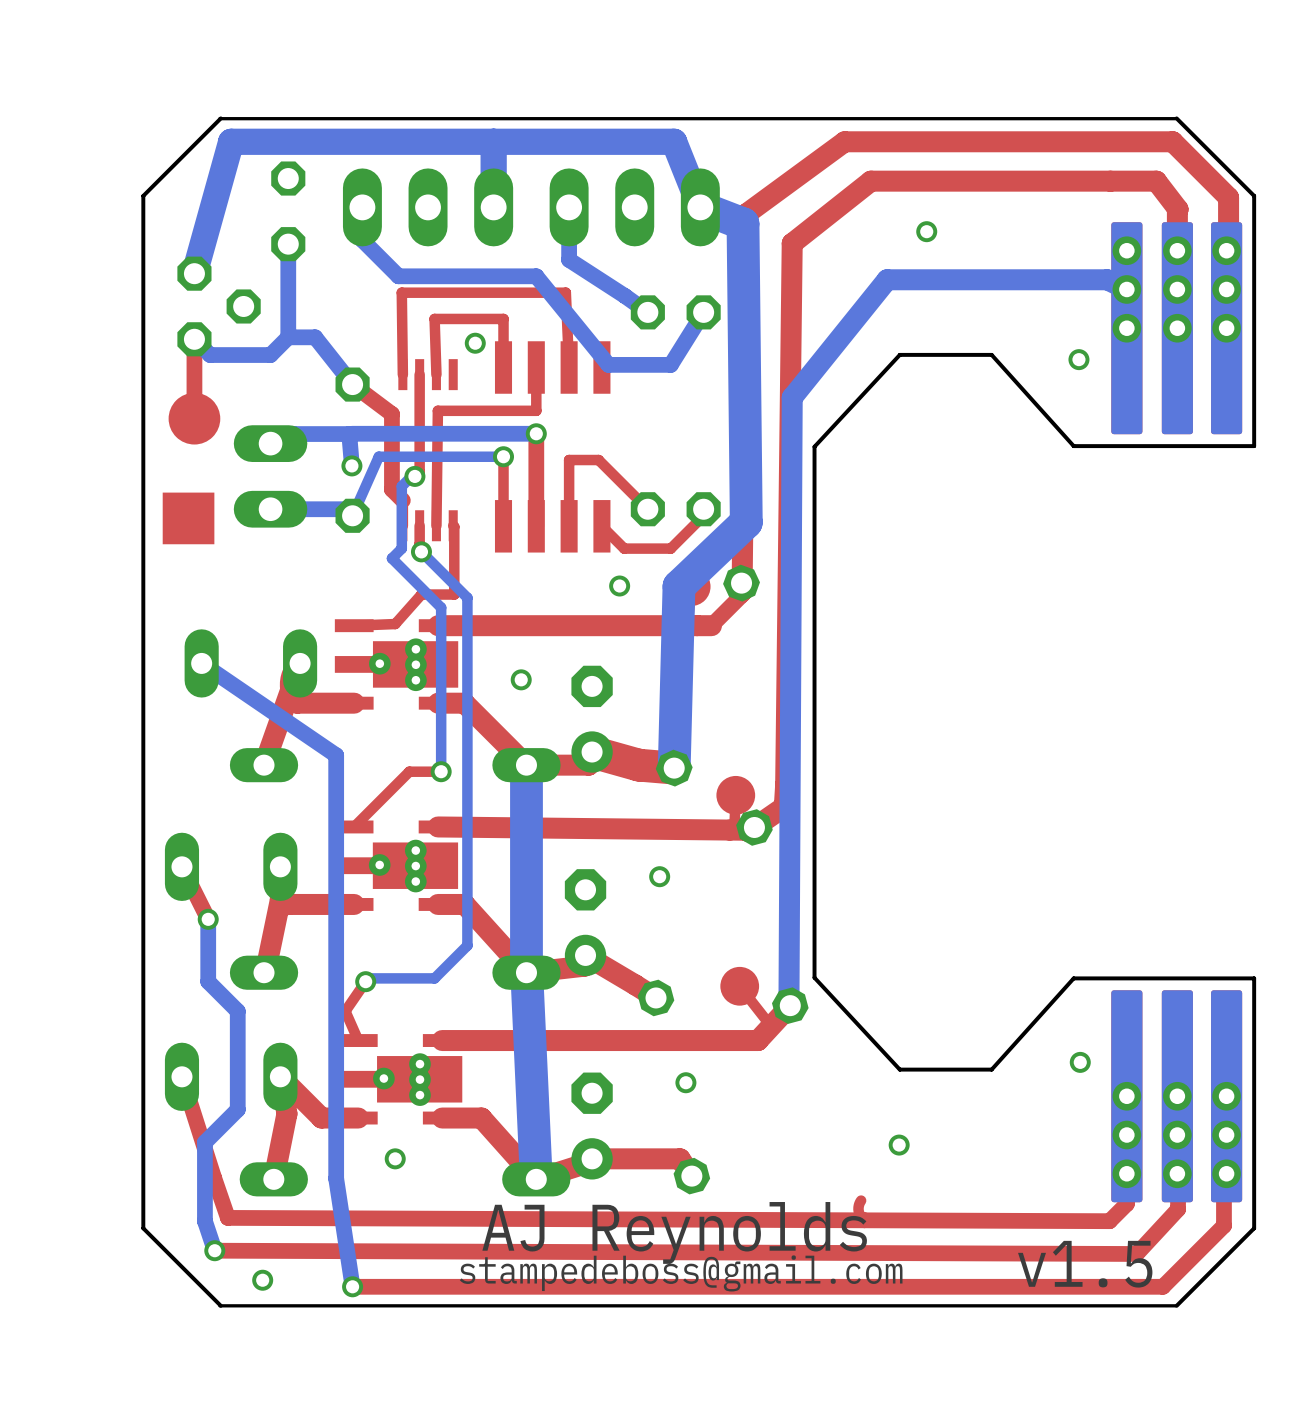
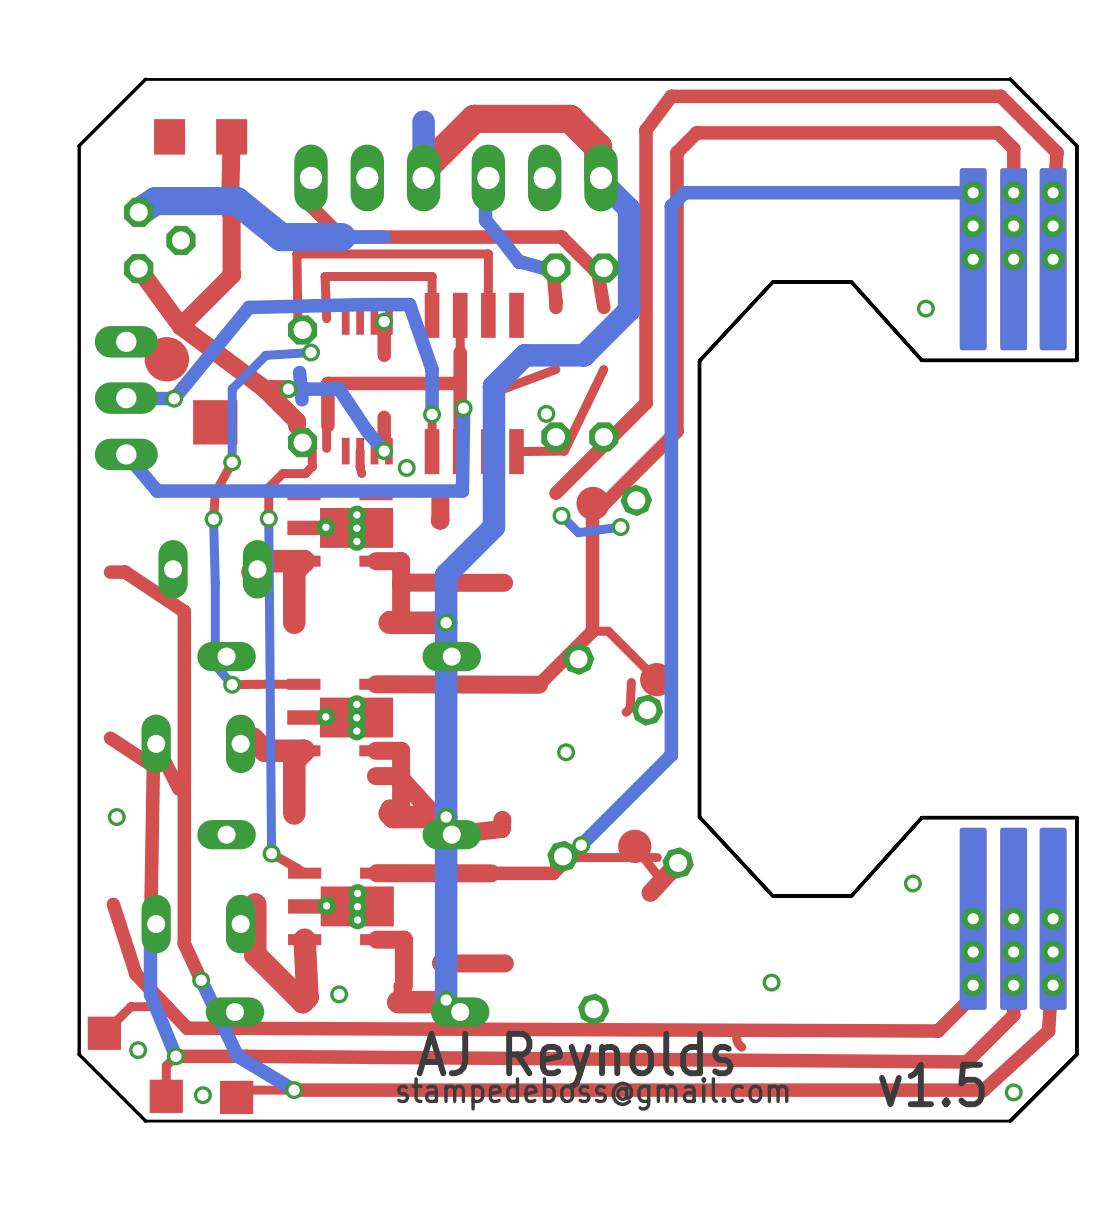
board edge: none -> (1010, 79) (1076, 145) (1076, 360) (921, 360) (851, 282) (772, 282) (699, 360) (699, 817) (772, 895) (851, 895) (921, 817) (1076, 817) (1076, 1054) (1010, 1121)
part: none -> (200, 136)
top track: none -> (231, 136) (229, 211) (231, 212) (232, 274) (180, 326)
top track: none -> (310, 177) (310, 206) (341, 237) (561, 237) (598, 273) (603, 307)
bottom track: (362, 207) (362, 240) (398, 276) -> (138, 212) (155, 201) (236, 201) (281, 237) (341, 237)
bottom track: none -> (485, 177) (485, 220) (519, 262) (553, 270)
bottom track: (569, 207) (569, 259) (647, 312) -> none
top track: none -> (598, 177) (598, 147) (570, 118) (474, 118) (423, 169) (423, 177)
bottom track: none -> (598, 177) (629, 208) (629, 310) (584, 355) (524, 355) (493, 386) (493, 527) (446, 574) (446, 1000)
part: (288, 211) -> none
top track: none -> (1013, 192) (1013, 148) (997, 132) (696, 132) (676, 152) (676, 431) (592, 515) (592, 631)
via: (926, 231) -> none
bottom track: (288, 244) (288, 337) -> none
bottom track: (194, 273) (231, 141) (674, 141) (700, 207) (743, 223) (746, 522) (679, 586) (674, 768) -> none
bottom track: (447, 276) (536, 276) (608, 364) (670, 364) (703, 312) -> none
bottom track: (1126, 289) (1107, 279) (887, 279) (792, 397) (788, 1007) (787, 1009) (790, 1005) -> none
bottom track: none -> (973, 259) (973, 192) (684, 192) (671, 206) (671, 755) (581, 845)
top track: none -> (1053, 259) (1053, 192) (1057, 152) (1000, 96) (671, 96) (646, 130) (646, 403) (555, 493)
part position: (219, 306) -> (159, 240)
top track: none -> (138, 268) (180, 326)
top track: none -> (553, 270) (555, 307)
top track: (503, 322) (503, 318) (434, 318) (436, 374) -> (432, 276) (325, 276) (326, 318)
top track: (1177, 328) (1178, 209) (1156, 181) (870, 181) (792, 243) (784, 806) (747, 831) (438, 826) -> none
top track: (1226, 328) (1228, 197) (1172, 141) (844, 141) (746, 213) (742, 595) -> none
bottom track: (288, 337) (270, 355) (210, 355) (194, 339) -> none
bottom track: (288, 337) (315, 337) (352, 384) -> none
top track: (194, 339) (194, 418) -> none
via position: (475, 343) -> (384, 321)
top track: (569, 367) (565, 292) (401, 292) (402, 374) -> (488, 315) (488, 253) (296, 253) (297, 318)
top track: (419, 374) (419, 471) (414, 476) -> none
top track: none -> (384, 321) (384, 355)
top track: none -> (180, 326) (268, 391) (271, 389) (288, 389)
top track: (352, 384) (391, 414) (391, 489) (402, 500) (402, 525) -> none
bottom track: none -> (310, 352) (265, 355) (232, 389) (232, 462)
via: none -> (310, 352)
top track: (536, 410) (437, 410) (436, 525) -> (460, 352) (460, 372)
part footprint: [233, 425, 308, 528] -> [193, 400, 238, 445]
bottom track: (536, 433) (293, 434) (270, 443) -> none
via: (536, 433) -> none
top track: none -> (460, 383) (327, 383) (326, 448)
top track: none -> (264, 388) (296, 421) (297, 448)
bottom track: none -> (288, 389) (339, 389) (367, 431) (384, 451)
bottom track: (503, 456) (378, 456) (352, 515) (346, 509) (270, 509) -> none
via: (503, 456) -> none
top track: (569, 460) (598, 460) (647, 509) -> (488, 394) (555, 369)
bottom track: none -> (126, 398) (174, 398) (249, 307) (409, 304) (432, 369) (432, 414)
part: none -> (126, 398)
via: none -> (174, 398)
via position: (351, 465) -> (288, 389)
bottom track: none -> (463, 408) (462, 491) (157, 491) (126, 454)
via: none -> (463, 408)
bottom track: (414, 476) (411, 476) (401, 486) (401, 548) (391, 558) (441, 607) (441, 771) -> none
via: (414, 476) -> none
via: none -> (432, 414)
via: none -> (546, 413)
top track: none -> (384, 417) (384, 451)
top track: (703, 509) (703, 515) (670, 548) (624, 548) (601, 526) -> (603, 369) (564, 451) (516, 451)
part: (188, 518) -> none
top track: none -> (312, 448) (312, 466) (305, 473) (282, 473) (268, 487) (268, 518)
via: none -> (384, 451)
top track: (453, 525) (454, 594) (421, 594) (395, 624) (354, 625) -> none
top track: none -> (232, 462) (215, 493) (213, 519)
via: none -> (232, 462)
via: none -> (406, 467)
bottom track: (421, 551) (467, 597) (467, 945) (434, 978) (365, 978) (365, 981) -> none
via: (421, 551) -> none
top track: none -> (440, 493) (439, 520)
top track: (741, 583) (744, 592) (711, 625) (438, 625) -> none
via position: (619, 586) -> (561, 515)
bottom track: none -> (561, 515) (578, 532) (620, 527)
bottom track: none -> (268, 518) (271, 853)
via: none -> (268, 518)
bottom track: none -> (213, 519) (215, 665) (232, 684)
via: none -> (213, 519)
via: none -> (620, 527)
top track: none -> (376, 561) (401, 561) (401, 619) (389, 619) (389, 622) (446, 622)
bottom track: (201, 663) (336, 755) (336, 1178) (352, 1286) -> none
part position: (396, 664) -> (340, 527)
top track: none -> (110, 572) (125, 572) (184, 611) (184, 943) (201, 980)
top track: none -> (252, 572) (263, 561) (303, 561) (294, 570) (294, 622)
top track: none -> (439, 582) (401, 582)
via: (521, 679) -> none
top track: none -> (504, 582) (439, 582)
part: none -> (577, 600)
top track: (354, 703) (297, 703) (291, 693) (290, 690) (290, 686) (290, 682) (293, 672) (300, 663) (264, 765) -> none
top track: (438, 703) (464, 703) (526, 765) (588, 765) (592, 752) (638, 765) (674, 768) -> none
part: (698, 712) -> none
part: (592, 719) -> none
via: none -> (446, 622)
top track: none -> (592, 631) (539, 684) (375, 684)
top track: none -> (592, 631) (608, 631) (656, 679)
bottom track: (526, 765) (526, 972) (526, 966) (536, 1179) -> none
top track: (441, 771) (409, 771) (354, 826) -> none
via: (441, 771) -> none
part position: (735, 795) -> (656, 679)
via: none -> (232, 684)
top track: none -> (303, 684) (232, 684)
top track: none -> (110, 738) (153, 766) (150, 935)
top track: none -> (252, 738) (265, 750) (303, 750) (294, 760) (294, 813)
part position: (396, 865) -> (340, 717)
top track: none -> (375, 750) (401, 750) (401, 808) (389, 808) (389, 813) (393, 817) (446, 817)
top track: (280, 899) (264, 972) -> none
top track: (280, 899) (286, 904) (354, 904) -> none
bottom track: (208, 919) (208, 981) (237, 1011) (237, 1109) (204, 1142) (204, 1221) (214, 1250) -> none
via: (208, 919) -> none
part: (585, 922) -> none
via: none -> (116, 817)
via: none -> (446, 817)
top track: (581, 966) (585, 955) (656, 997) -> none
top track: (365, 981) (345, 1011) (358, 1040) -> none
via position: (365, 981) -> (271, 853)
top track: none -> (581, 845) (553, 873) (376, 873)
via: none -> (581, 845)
top track: none -> (271, 853) (304, 873)
top track: none -> (657, 857) (568, 857) (561, 864)
top track: (758, 1040) (442, 1040) -> none
top track: none -> (113, 904) (135, 974) (187, 1028) (938, 1031) (973, 995) (973, 918)
top track: none -> (255, 904) (255, 954) (302, 1002) (307, 997) (304, 939)
via position: (1080, 1062) -> (912, 883)
top track: none -> (1013, 918) (1013, 1015) (966, 1061) (175, 1056) (166, 1065) (166, 1096)
top track: none -> (1053, 918) (1053, 985) (1051, 986) (1048, 1031) (983, 1090) (243, 1090) (236, 1097)
top track: (181, 1076) (227, 1217) (1109, 1221) (1126, 1203) (1126, 1096) -> none
part position: (400, 1079) -> (340, 906)
via: (685, 1082) -> none
bottom track: none -> (150, 935) (150, 994) (175, 1056)
top track: none -> (376, 939) (403, 939) (403, 985) (398, 985) (398, 1002) (444, 1002) (446, 1000) (446, 963)
top track: (1177, 1096) (1178, 1209) (1136, 1253) (214, 1250) -> none
top track: (1226, 1096) (1226, 1173) (1223, 1176) (1223, 1225) (1162, 1286) (352, 1286) -> none
top track: (358, 1118) (321, 1118) (280, 1076) (286, 1113) (273, 1179) -> none
top track: (442, 1118) (481, 1118) (536, 1179) (587, 1162) (592, 1158) (680, 1158) (691, 1176) -> none
top track: none -> (441, 962) (504, 963)
part: (592, 1126) -> none
bottom track: none -> (201, 980) (237, 1056) (294, 1090)
via: none -> (201, 980)
via: none -> (446, 1000)
top track: none -> (166, 1006) (130, 1006) (104, 1033)
part: none -> (104, 1033)
via: none -> (138, 1050)
via position: (214, 1250) -> (175, 1056)
via: none -> (1013, 1092)
via: none -> (202, 1095)
part: none -> (166, 1096)
part: none -> (236, 1097)
via: (262, 1280) -> none
via position: (352, 1286) -> (294, 1090)

